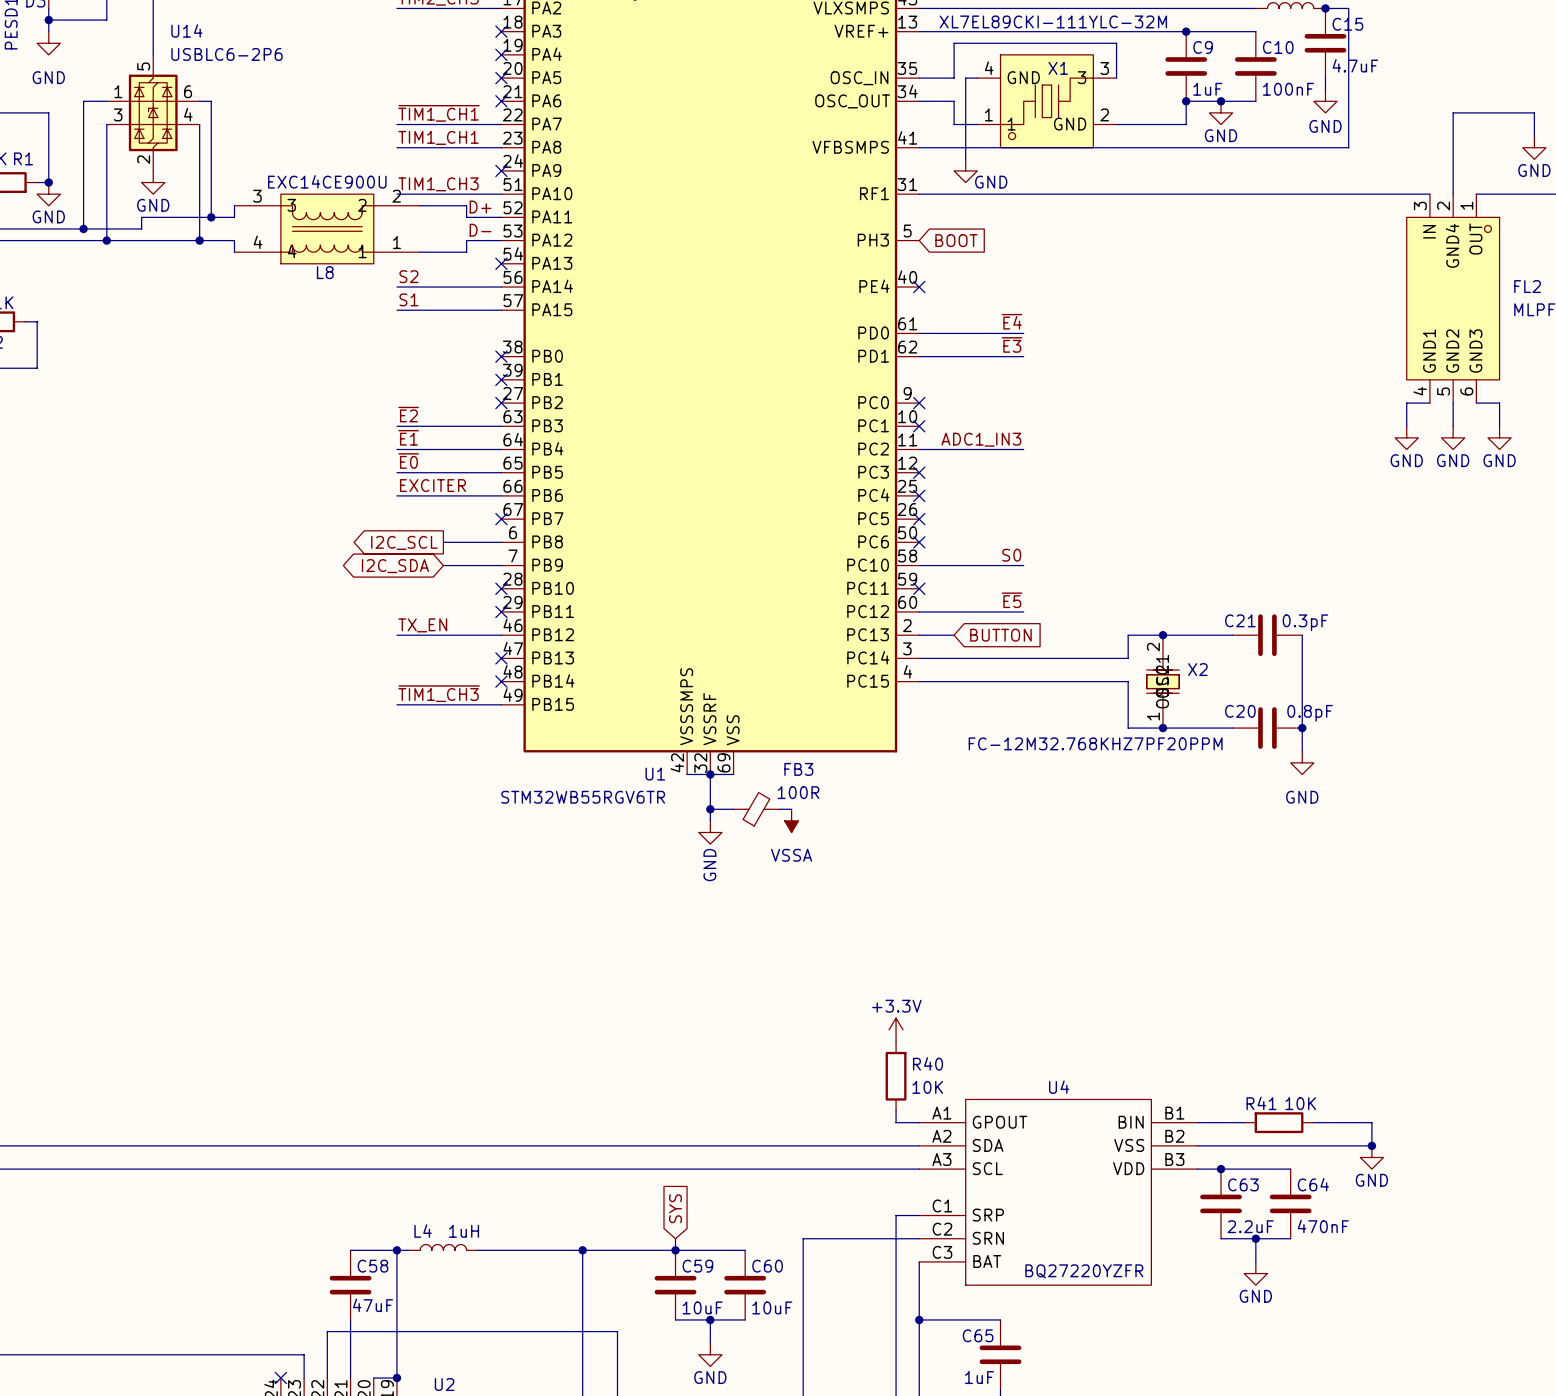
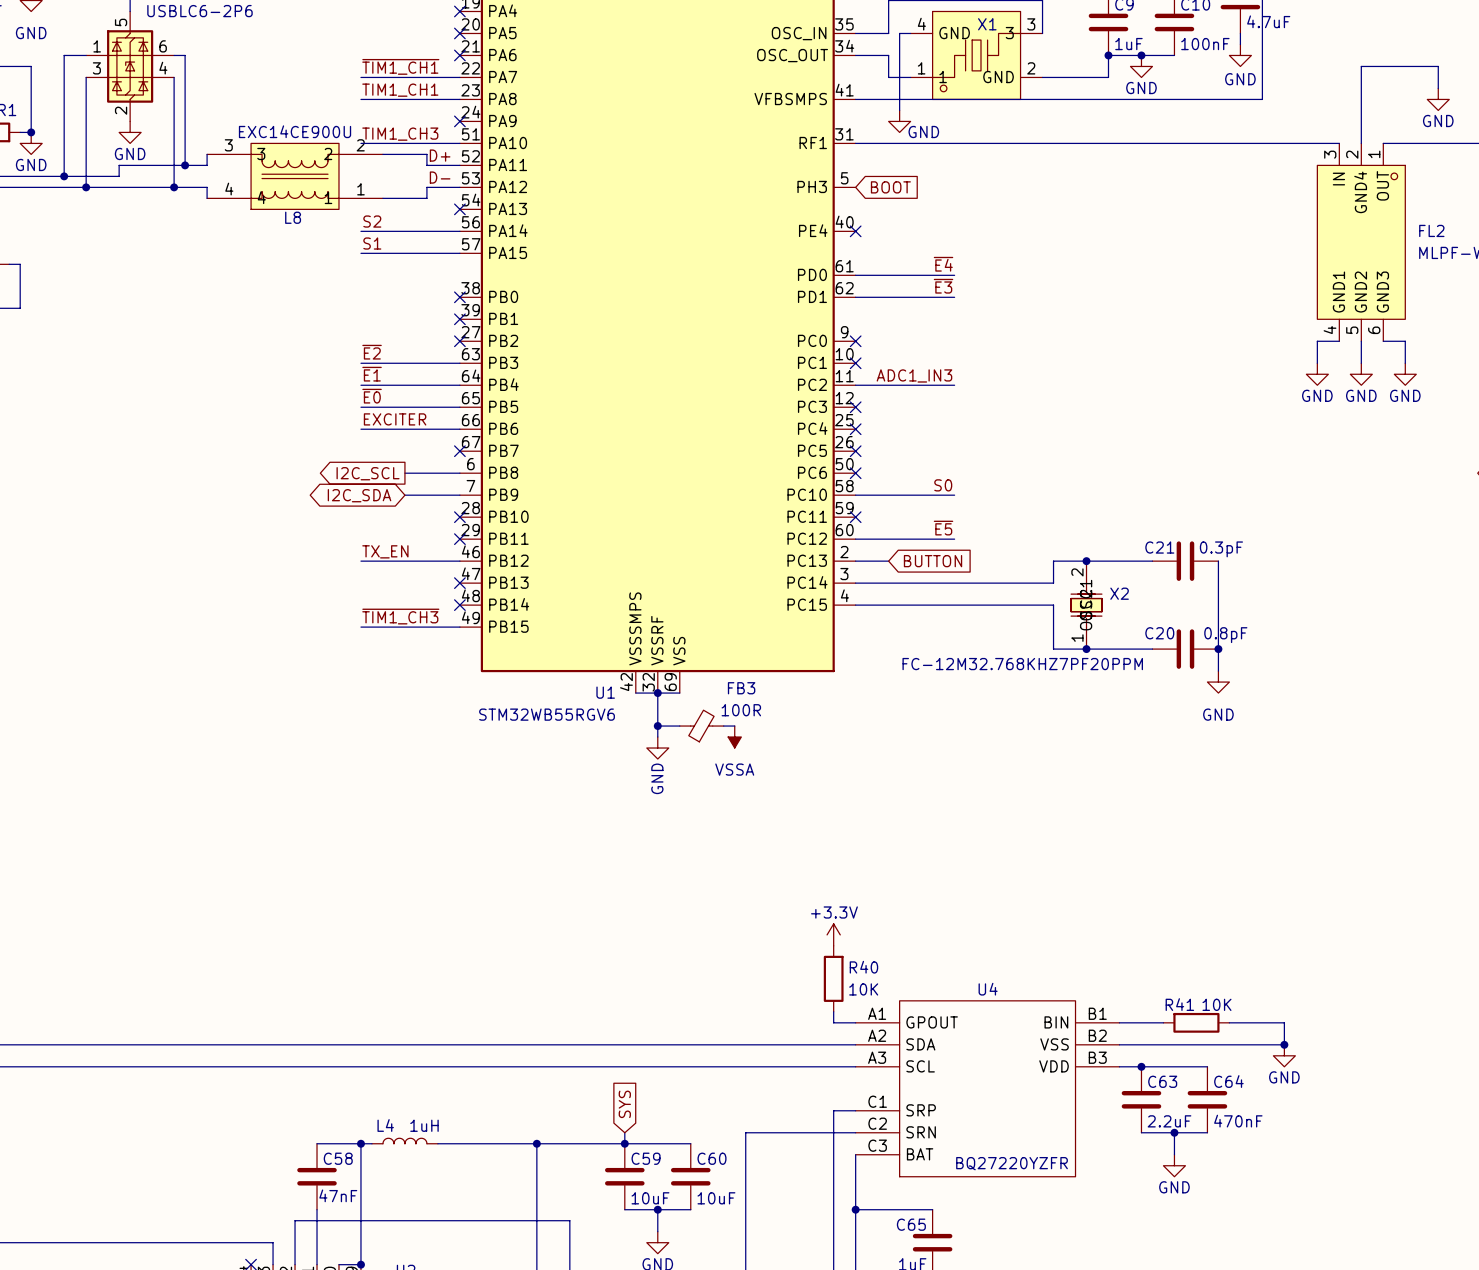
U1 value: STM32WB55RGV6TR (583, 797) -> STM32WB55RGV6 (547, 714)
C58 value: 47uF (373, 1305) -> 47nF (338, 1195)

